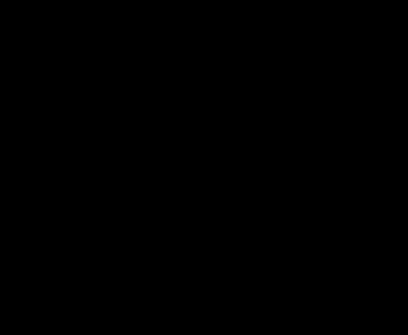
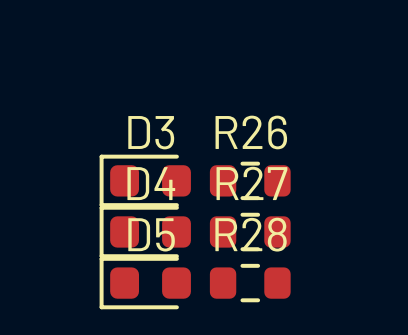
D3: none -> (145, 180)
R26: none -> (250, 180)
D4: none -> (145, 231)
R27: none -> (250, 231)
D5: none -> (145, 283)
R28: none -> (250, 283)

